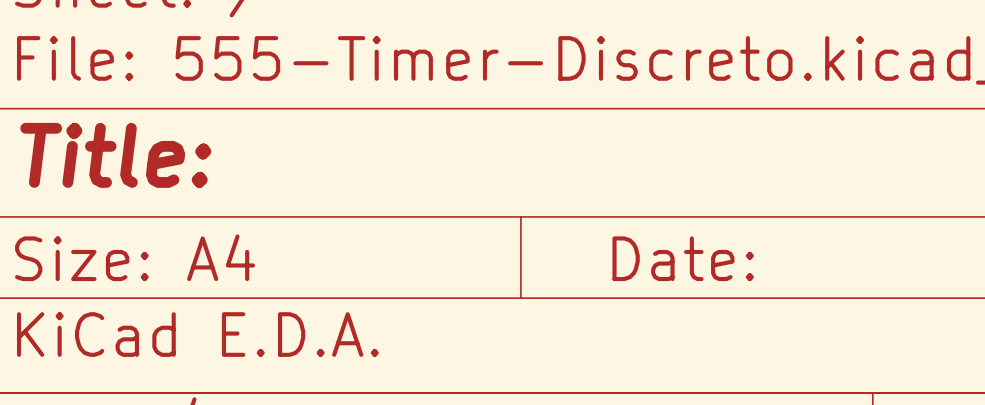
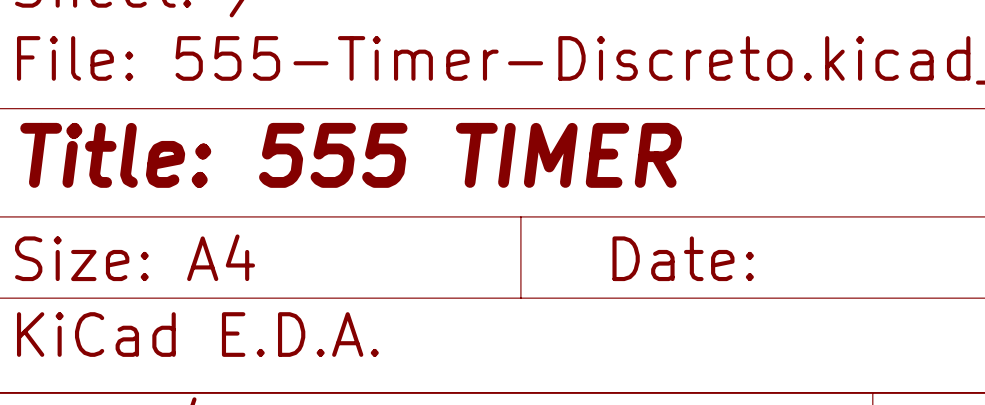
title block: Title: (115, 155) -> Title: 555 TIMER (351, 155)

